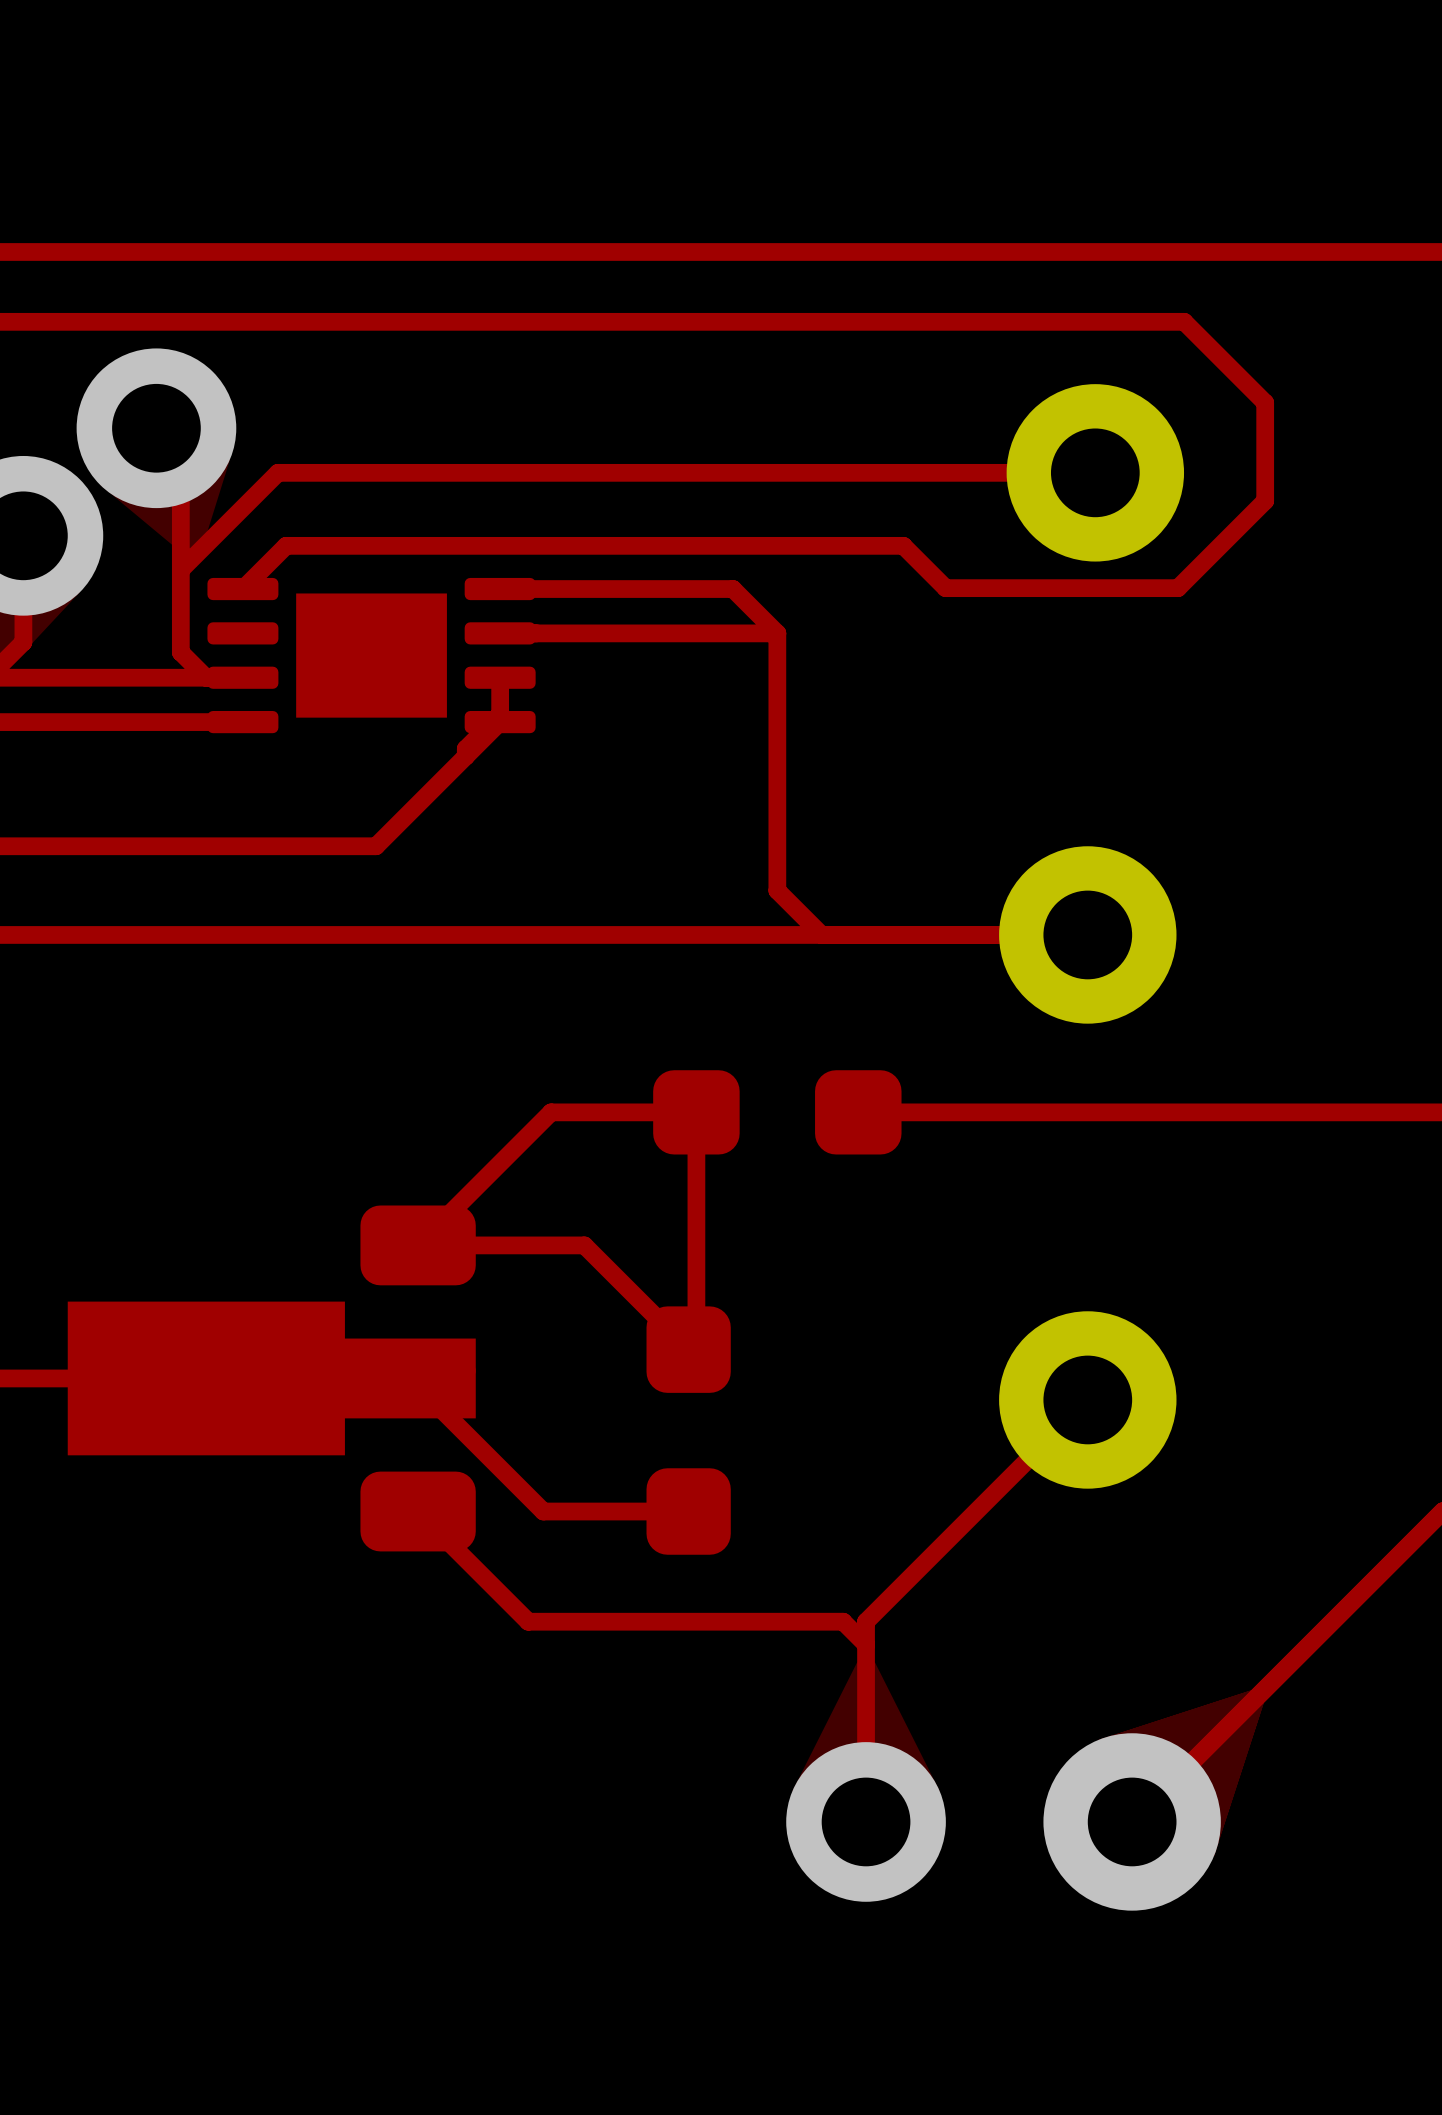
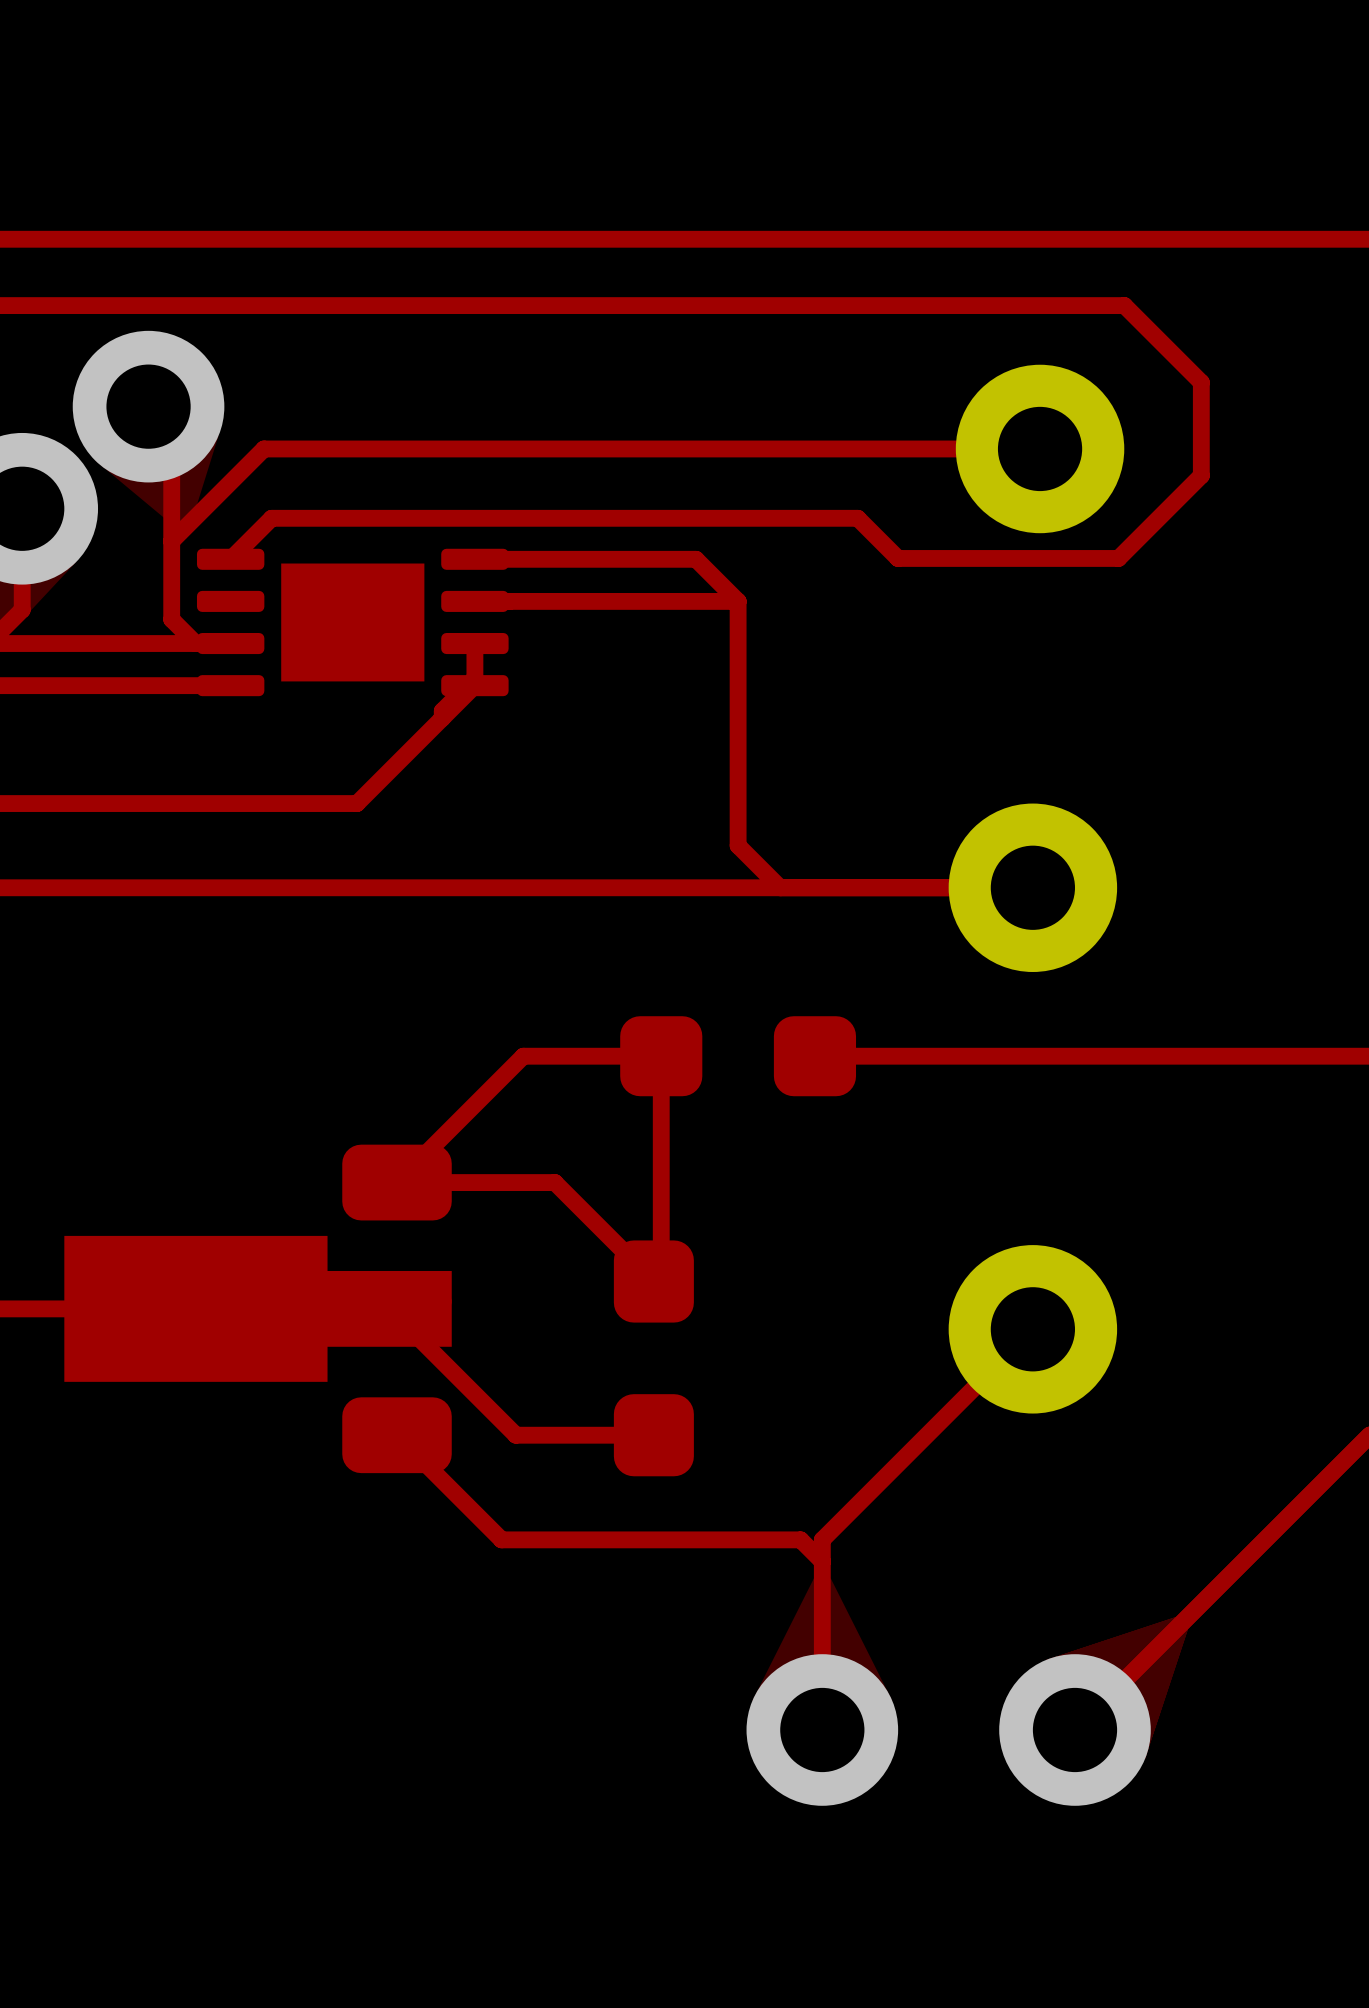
via size: [1043, 1733, 1221, 1911] -> [999, 1654, 1151, 1806]

